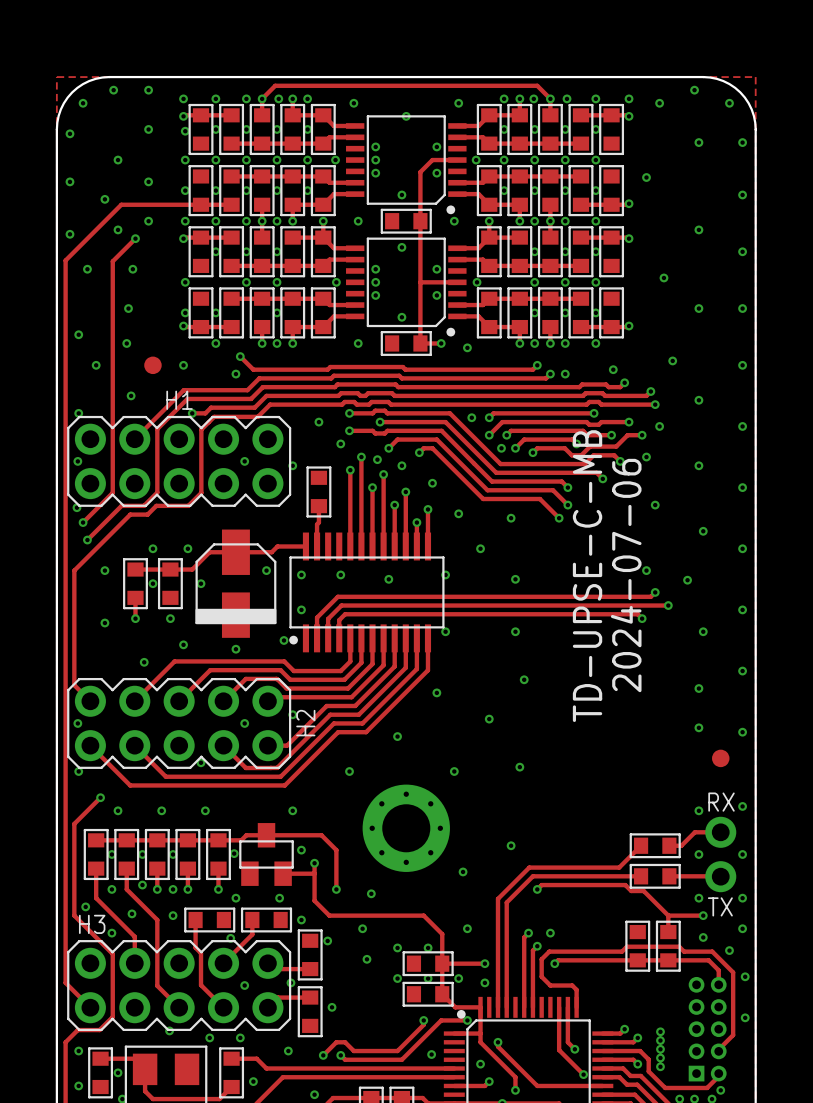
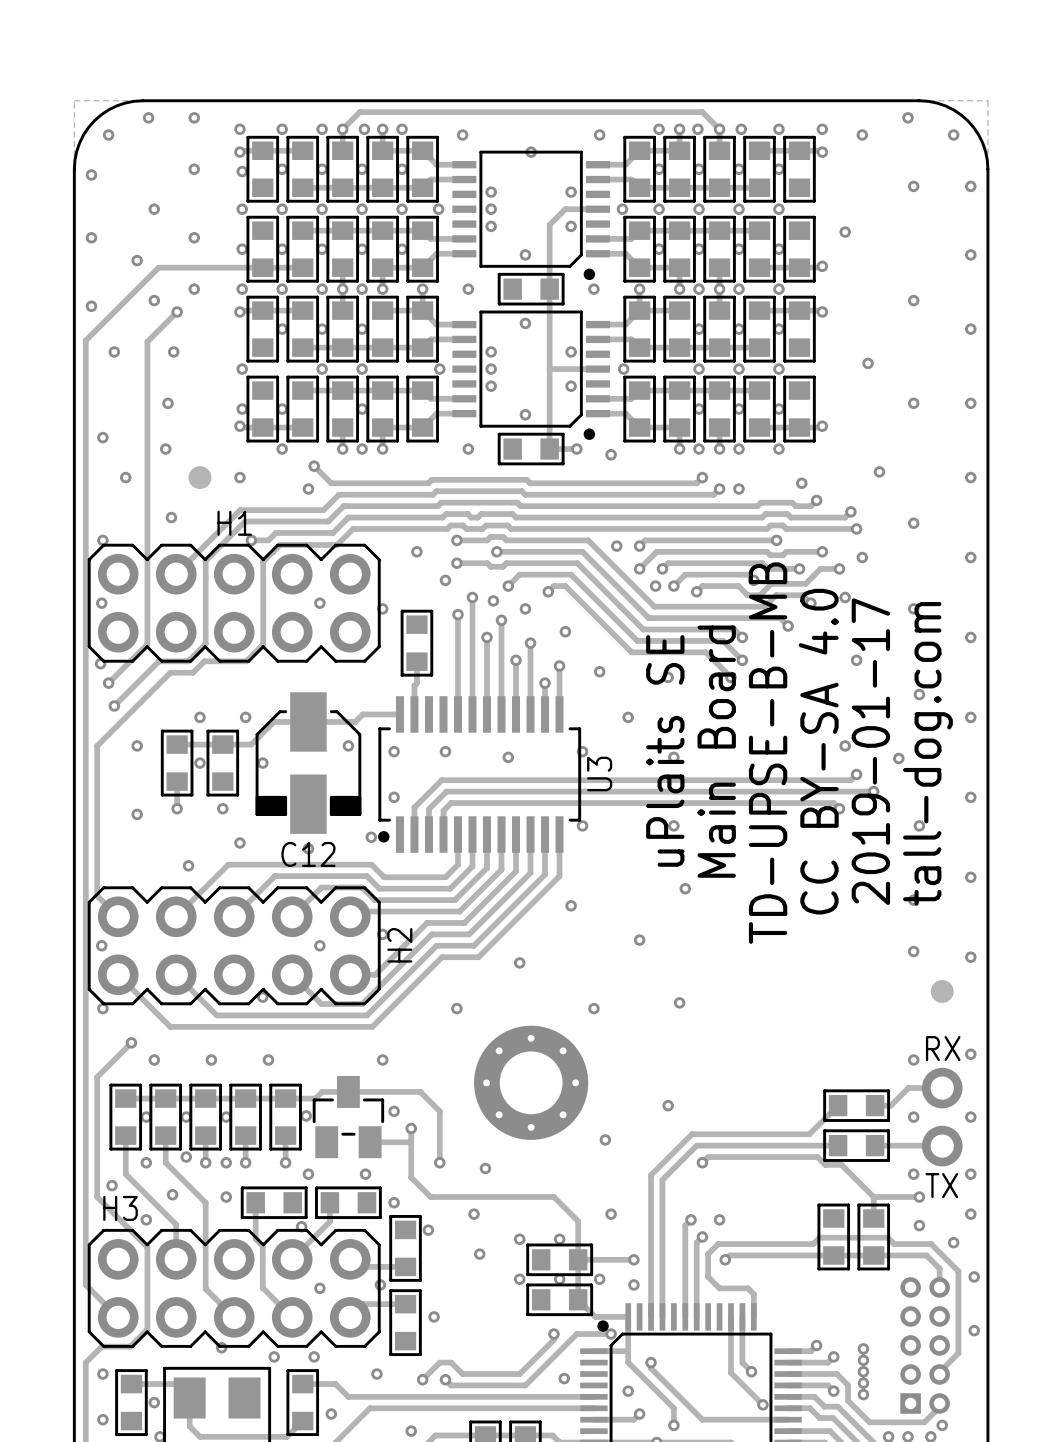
text: none -> uPlaits SE (665, 750)
text: none -> Main Board (716, 751)
text: none -> 2019-01-17 (870, 751)
text: 2024-07-06 (626, 575) -> CC BY-SA 4.0 (818, 751)
text: TD-UPSE-C-MB (587, 576) -> TD-UPSE-B-MB (768, 753)
text: none -> tall-dog.com (927, 753)
part: (235, 583) -> none
C12: none -> (308, 763)
part: (366, 592) -> none
U3: none -> (479, 774)
part footprint: [239, 823, 294, 886] -> [312, 1075, 385, 1159]

